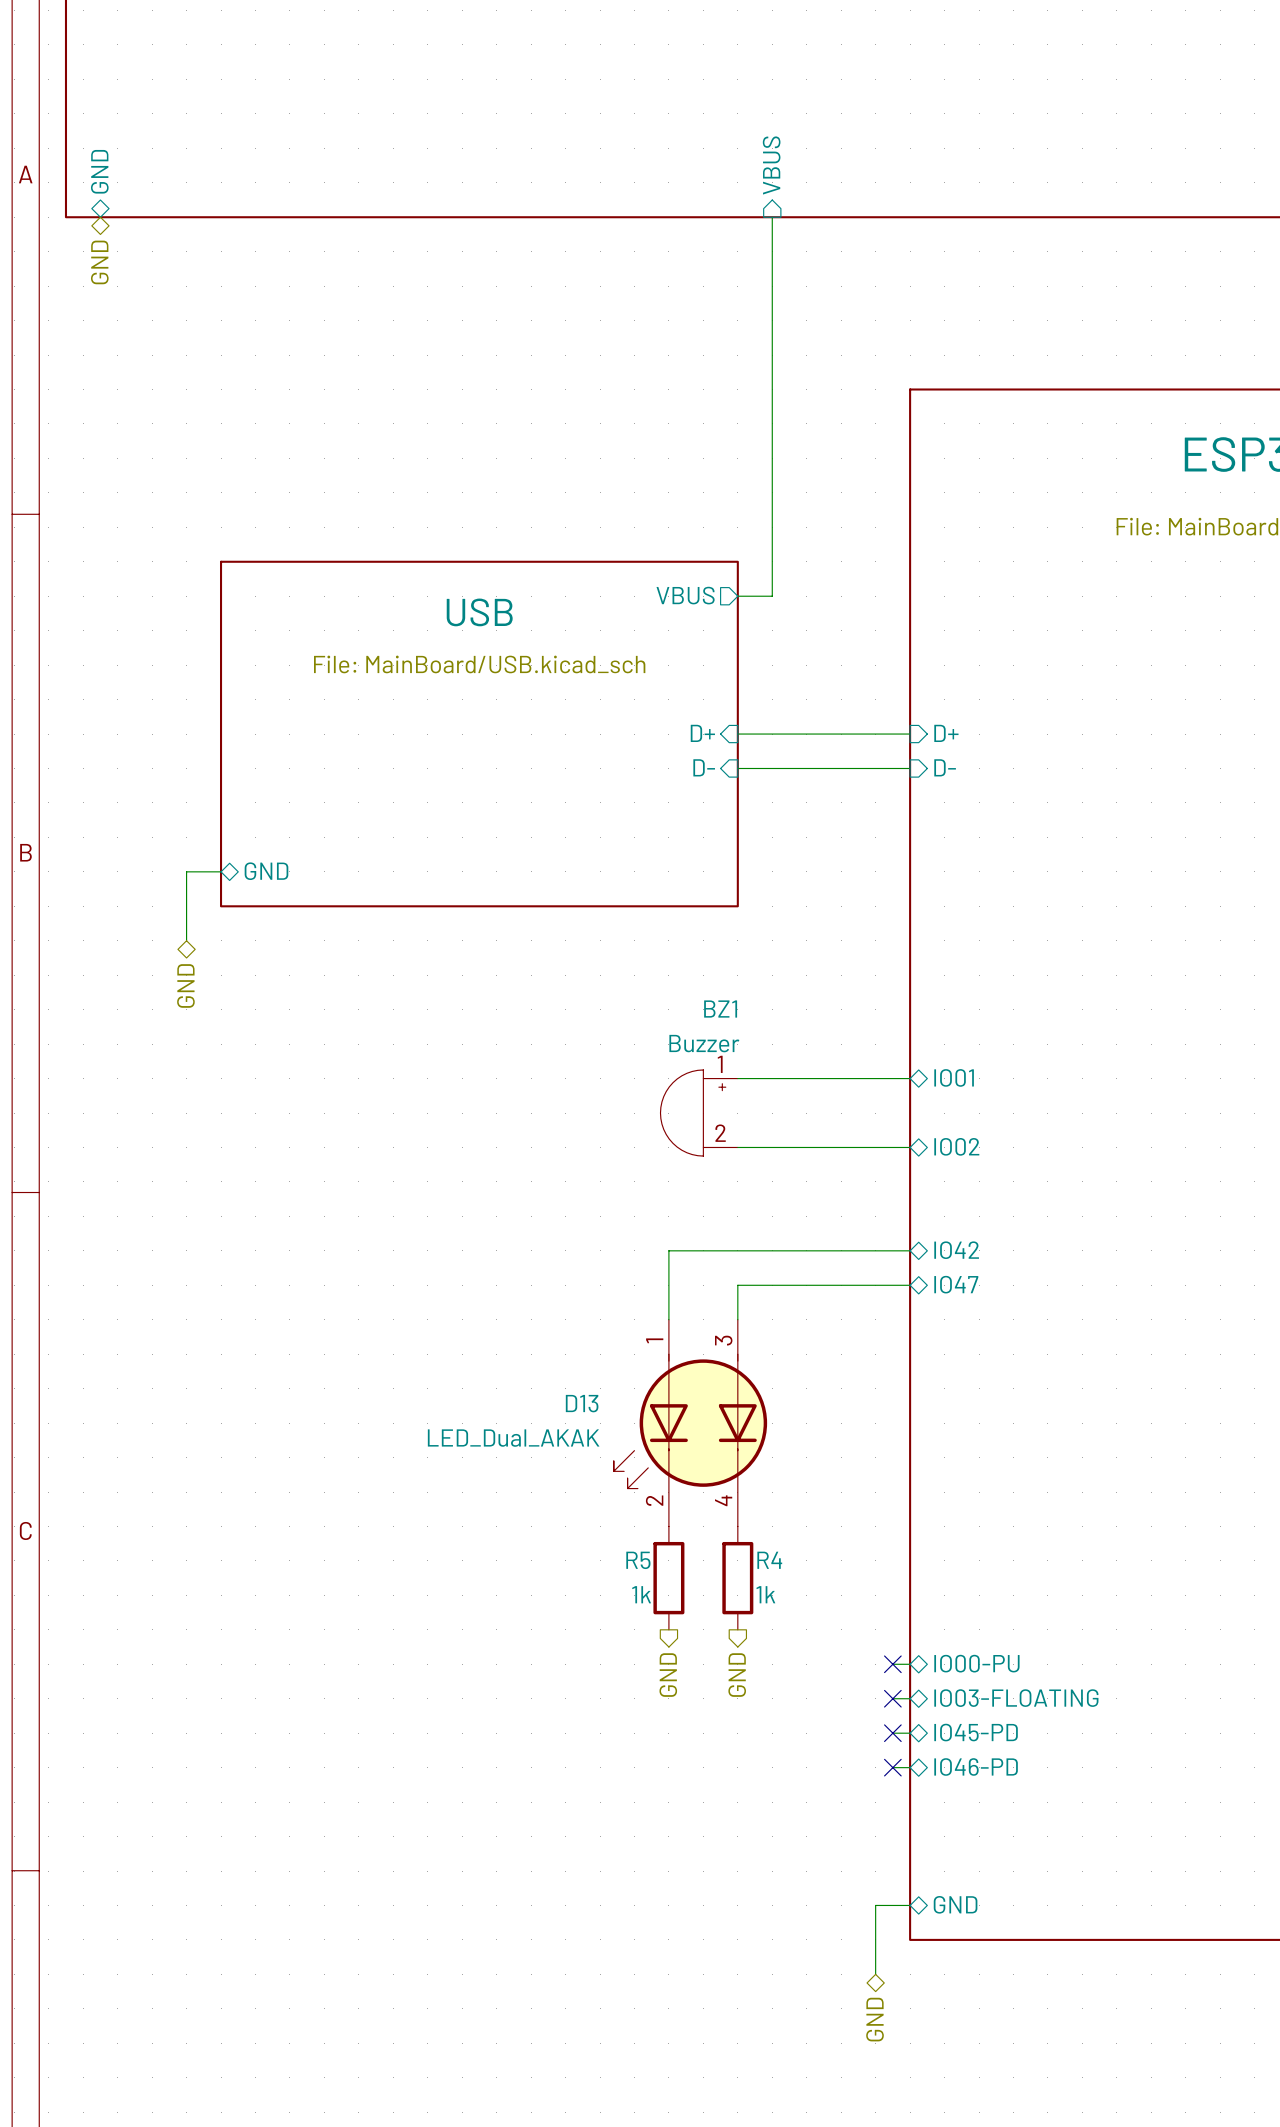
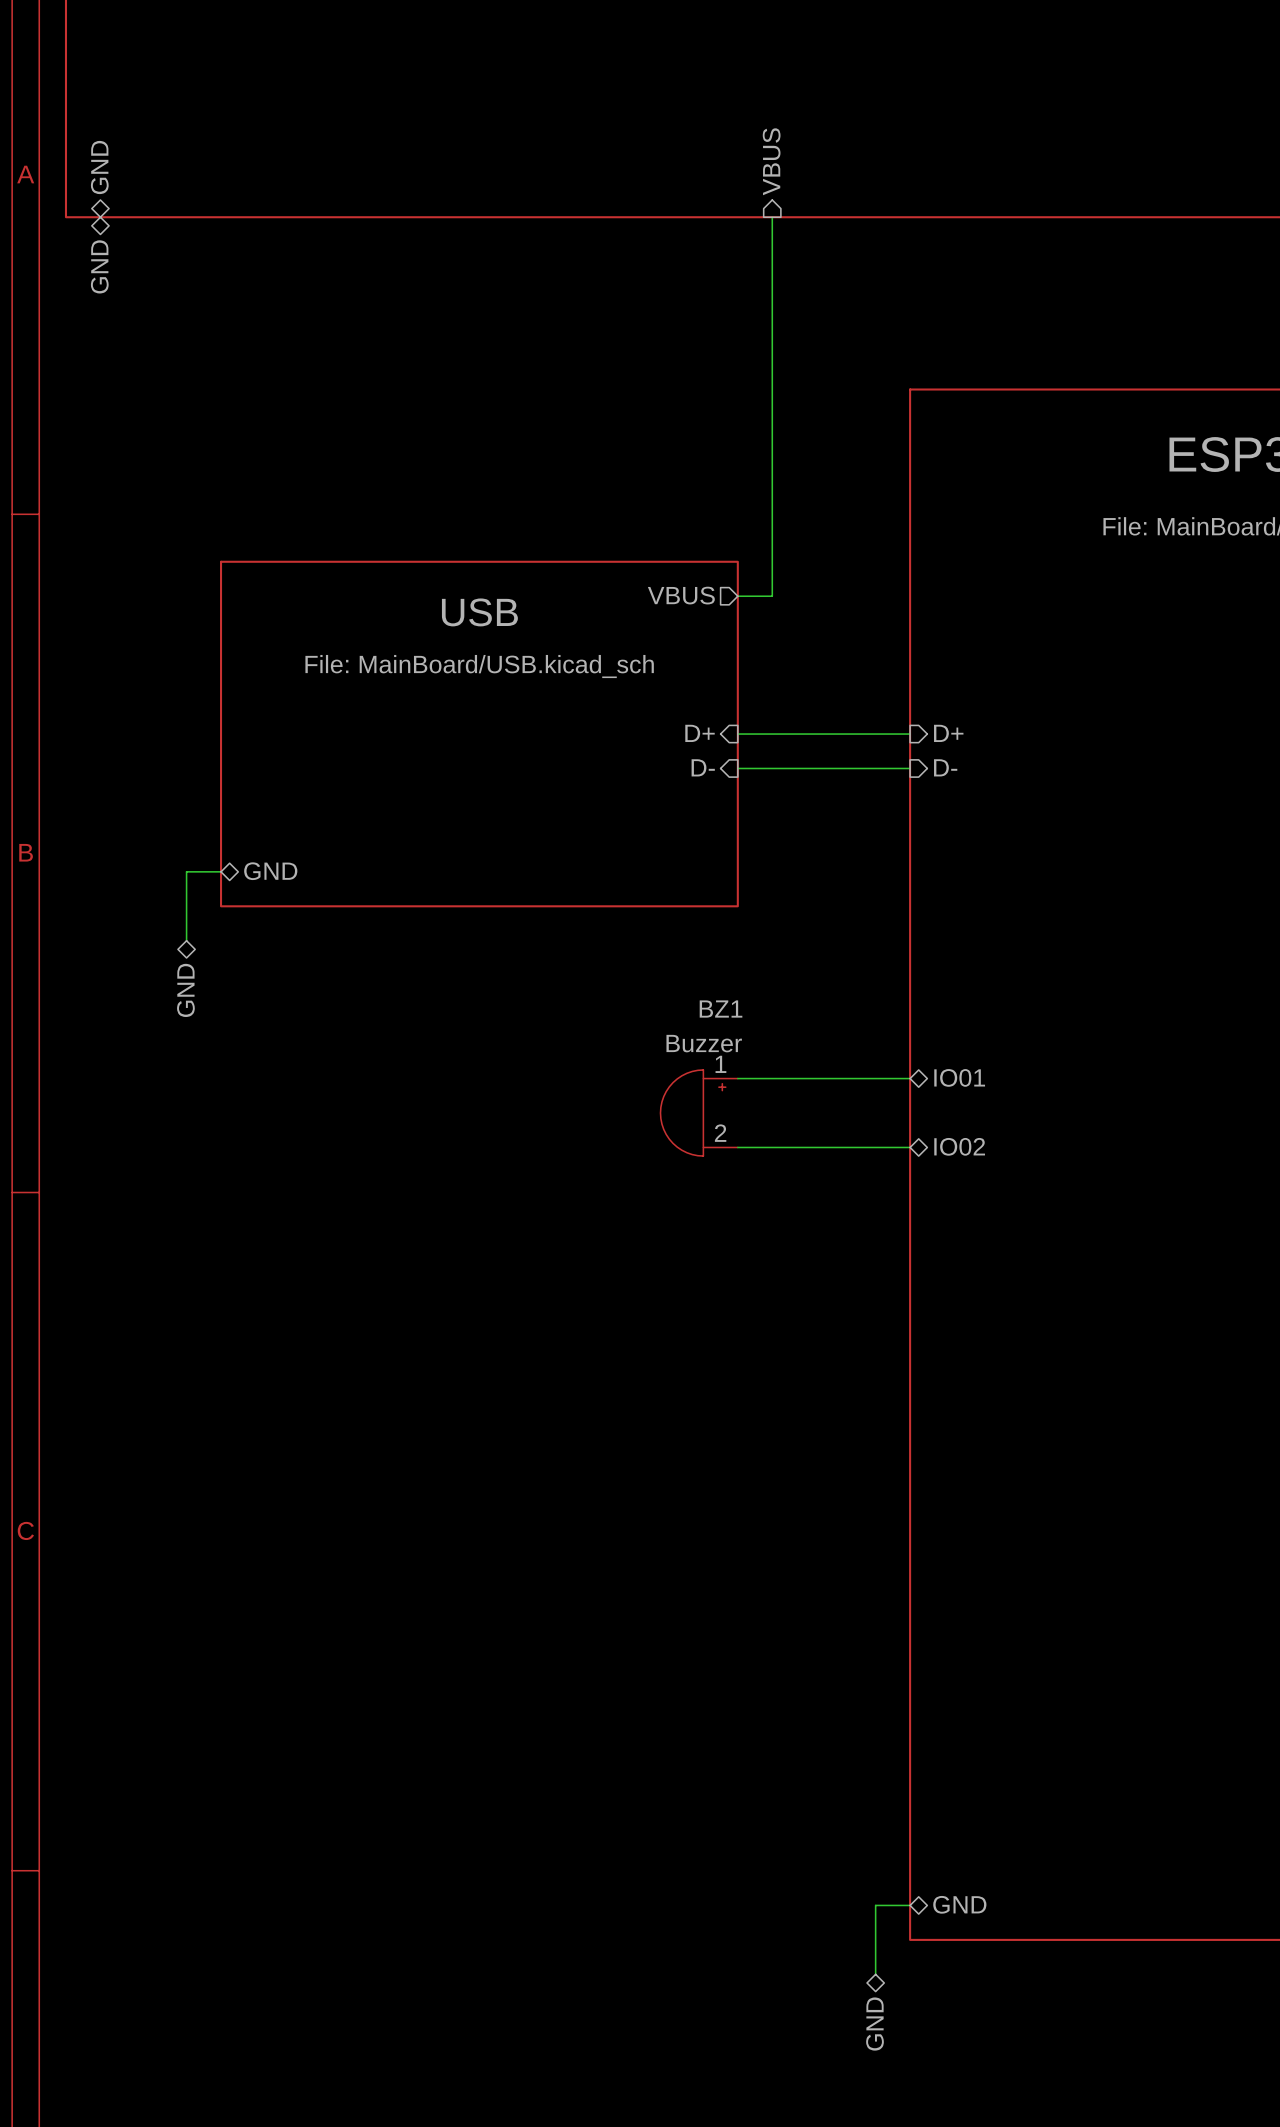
wire: (910, 1250) (668, 1250) (668, 1319) -> none
sheet pin: IO42 (956, 1250) -> none
sheet pin: IO47 (956, 1284) -> none
wire: (910, 1285) (737, 1285) (737, 1319) -> none
D13: LED_Dual_AKAK (690, 1423) -> none
R5: 1k (668, 1578) -> none
R4: 1k (737, 1578) -> none
sheet pin: IO00-PU (976, 1663) -> none
wire: (892, 1664) (910, 1664) -> none
no-connect mark: (892, 1664) -> none
hierarchical label: GND (668, 1675) -> none
hierarchical label: GND (737, 1675) -> none
wire: (892, 1698) (910, 1698) -> none
no-connect mark: (892, 1698) -> none
sheet pin: IO03-FLOATING (1016, 1698) -> none
sheet pin: IO45-PD (976, 1732) -> none
wire: (892, 1733) (910, 1733) -> none
no-connect mark: (892, 1733) -> none
sheet pin: IO46-PD (976, 1766) -> none
wire: (892, 1767) (910, 1767) -> none
no-connect mark: (892, 1767) -> none

